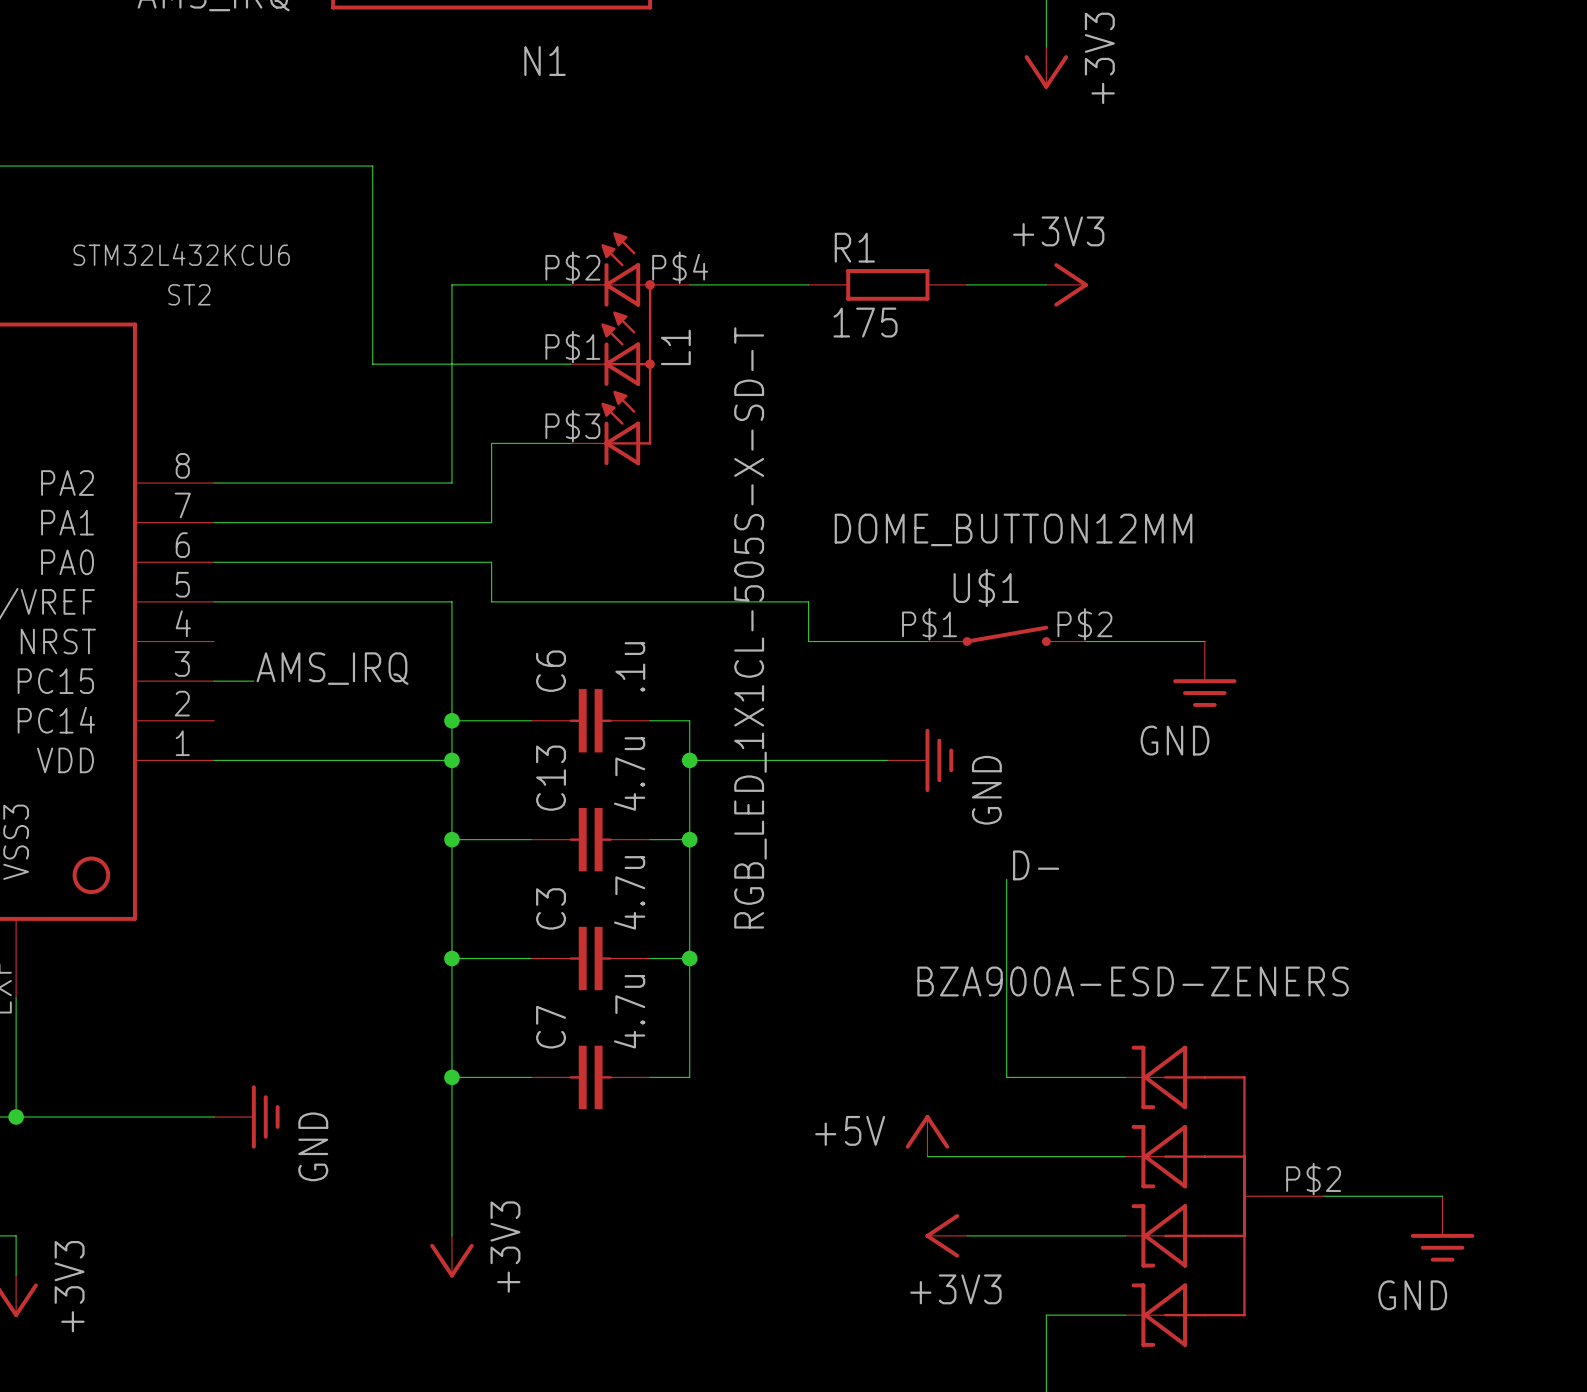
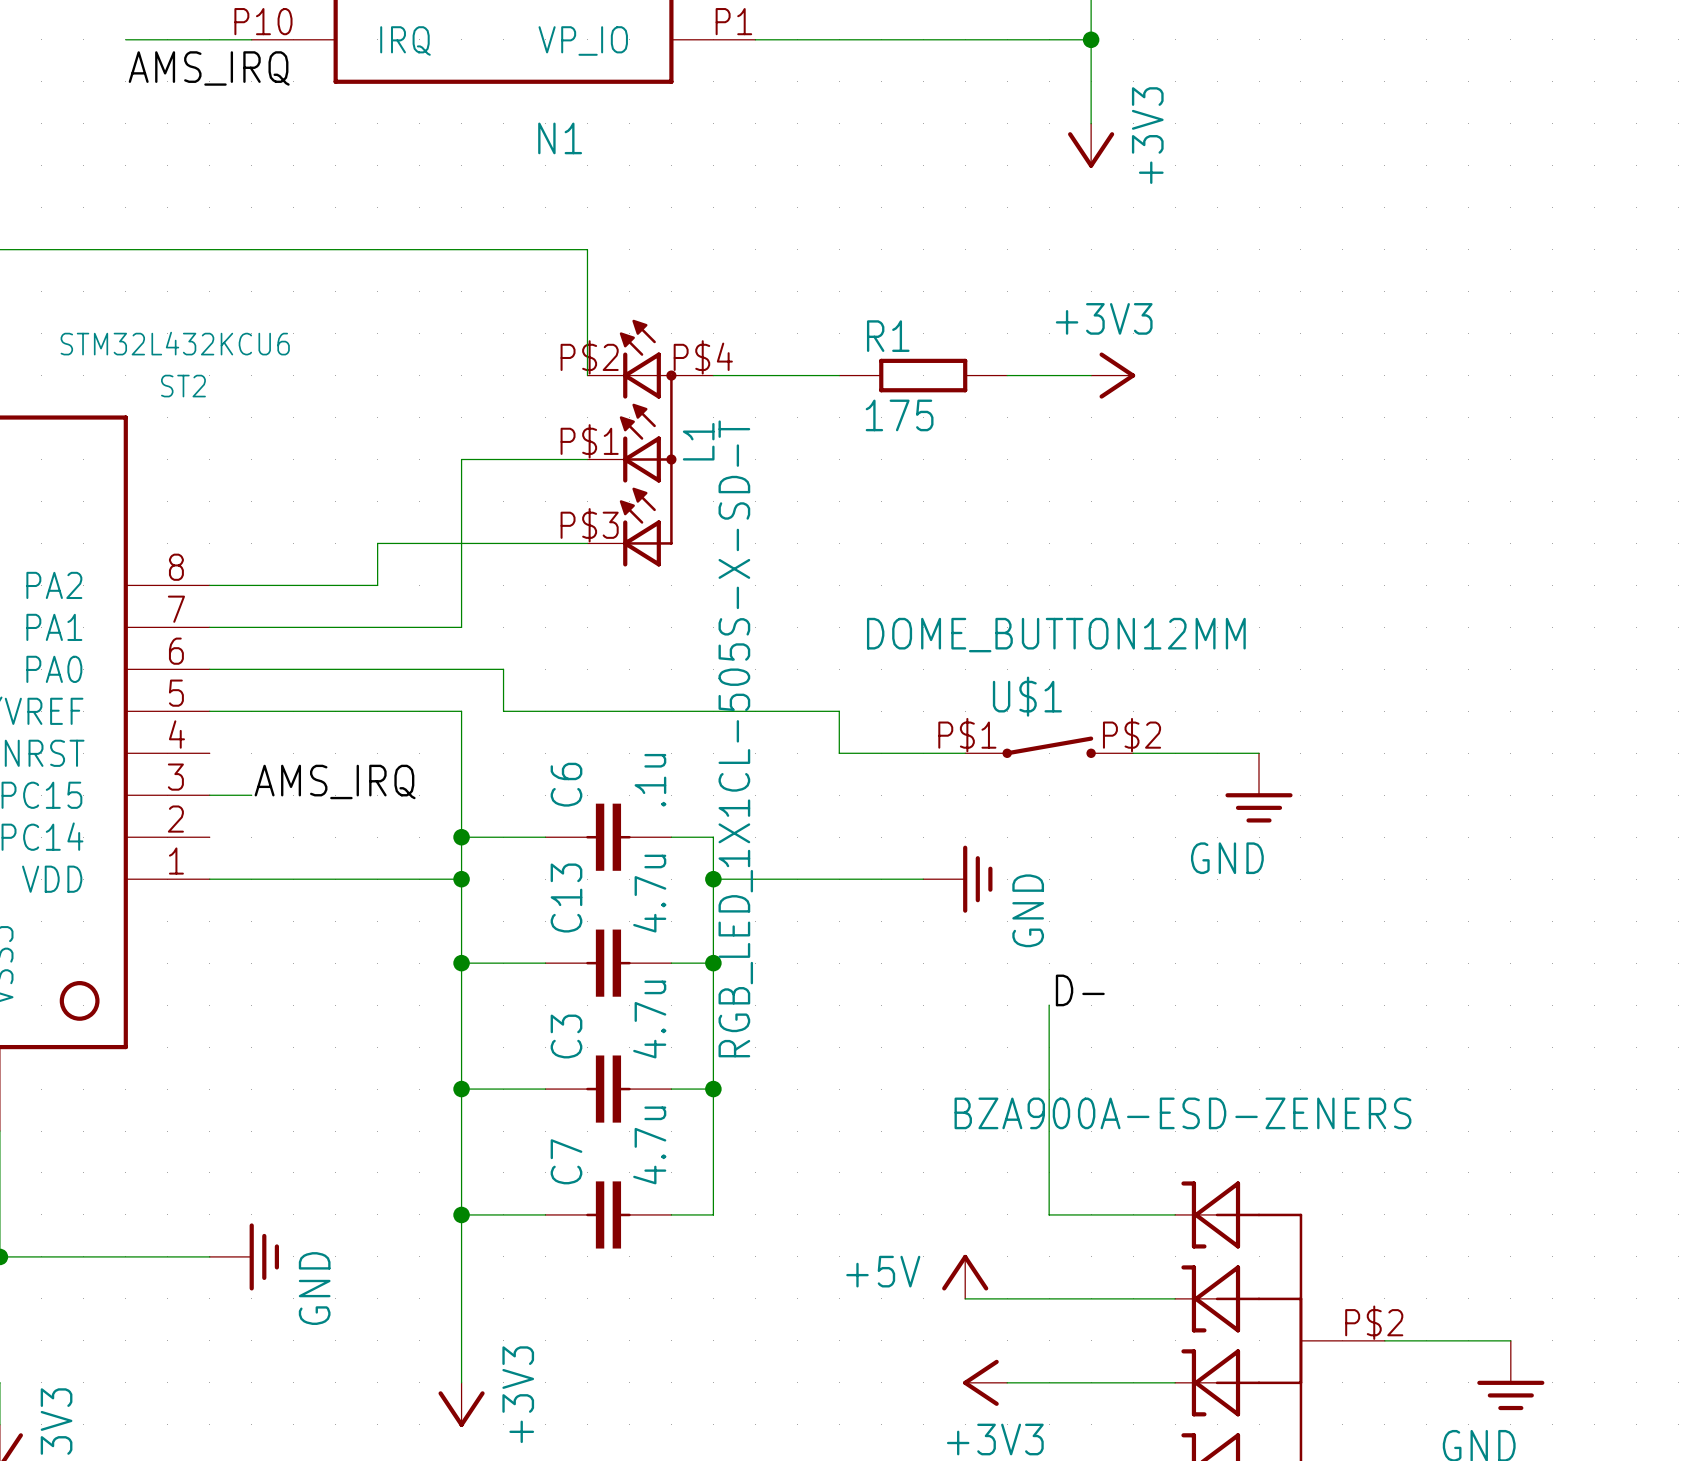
wire: (372, 166) (372, 364) (451, 364) (451, 284) (570, 284) -> (377, 249) (587, 249) (587, 375)
wire: (491, 443) (491, 522) (451, 522) -> (461, 585) (461, 627)
wire: (372, 483) (451, 483) -> (377, 585) (377, 543) (503, 543)
L1 value position: RGB_LED_1X1CL-505S-X-SD-T (750, 627) -> RGB_LED_1X1CL-505S-X-SD-T (735, 738)

